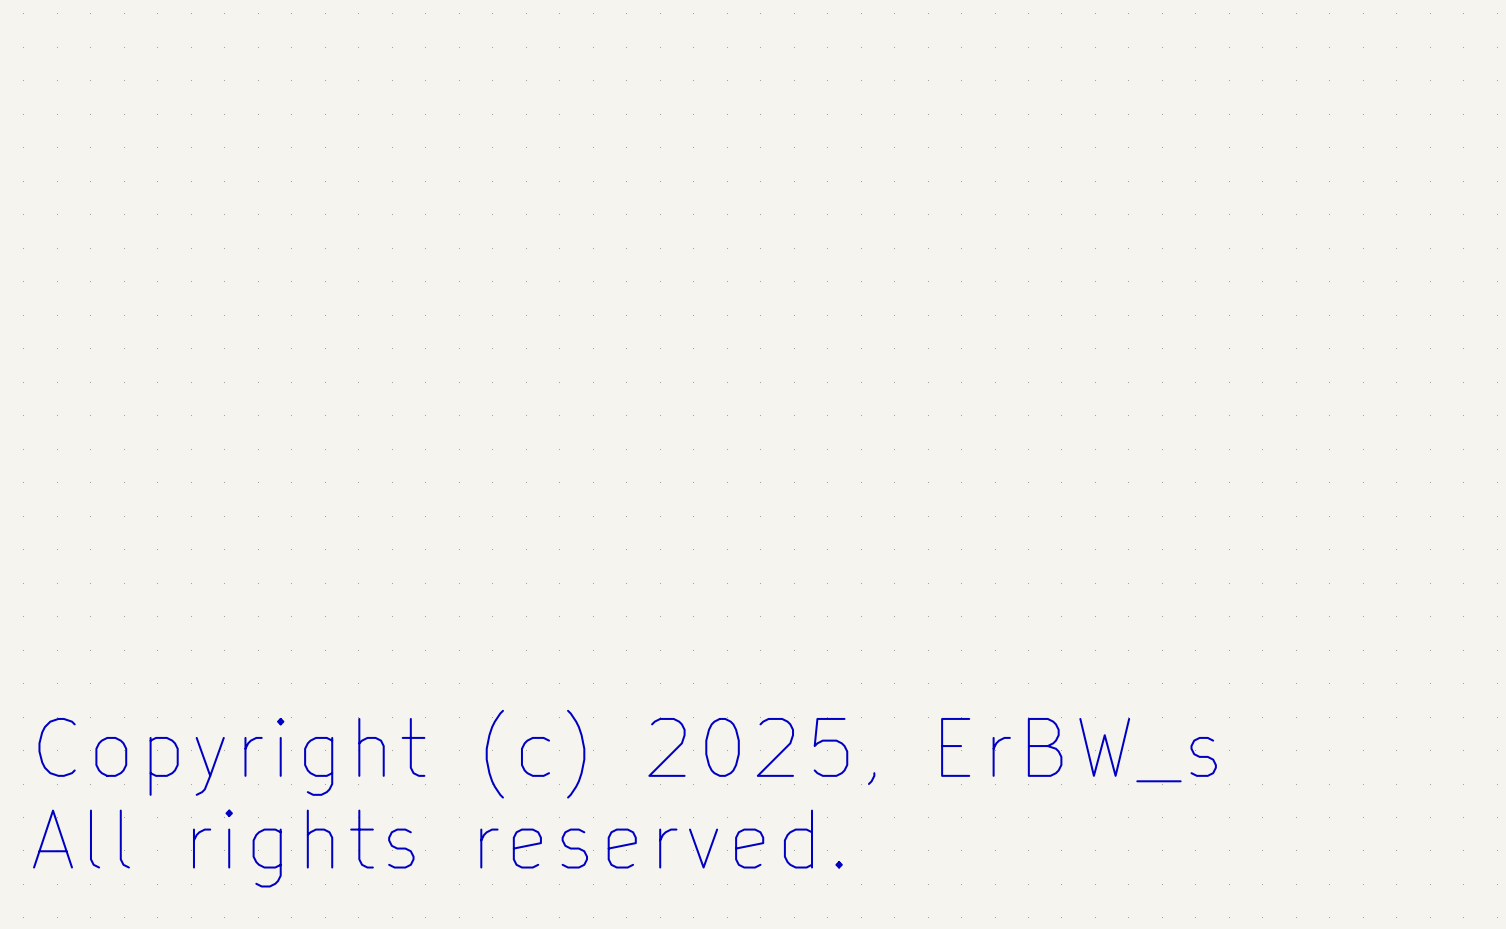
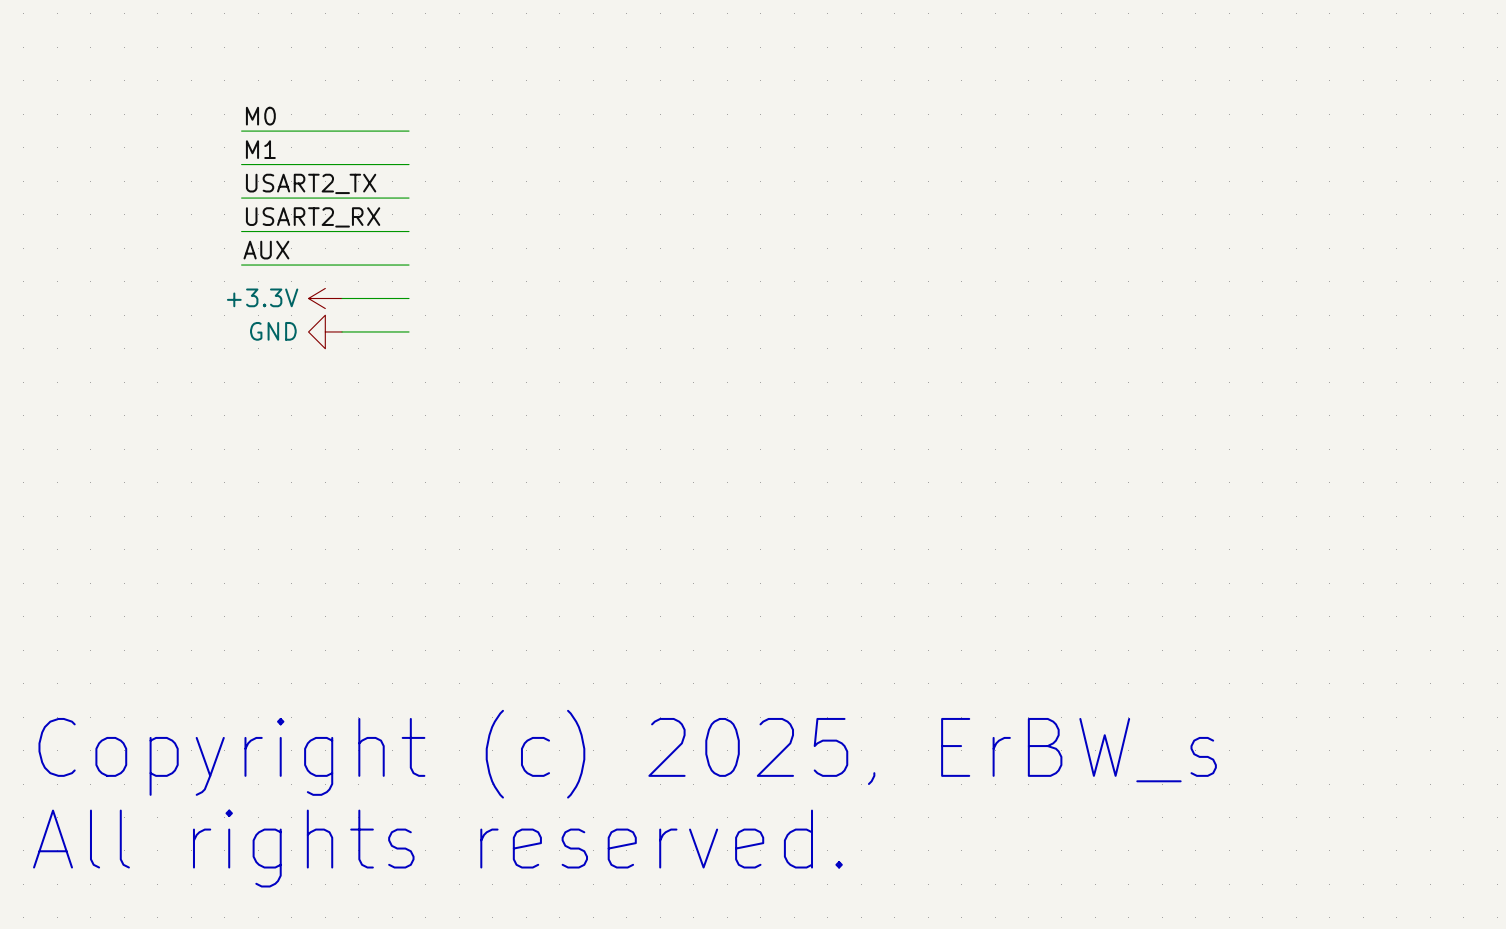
label: none -> M0 (260, 116)
wire: none -> (241, 131) (409, 131)
label: none -> M1 (260, 149)
wire: none -> (241, 164) (409, 164)
label: none -> USART2_TX (311, 183)
wire: none -> (241, 198) (409, 198)
label: none -> USART2_RX (313, 217)
wire: none -> (241, 231) (409, 231)
label: none -> AUX (266, 250)
wire: none -> (241, 265) (409, 265)
power symbol: none -> +3.3V (325, 298)
wire: none -> (342, 298) (409, 298)
power symbol: none -> GND (325, 331)
wire: none -> (342, 331) (409, 331)

